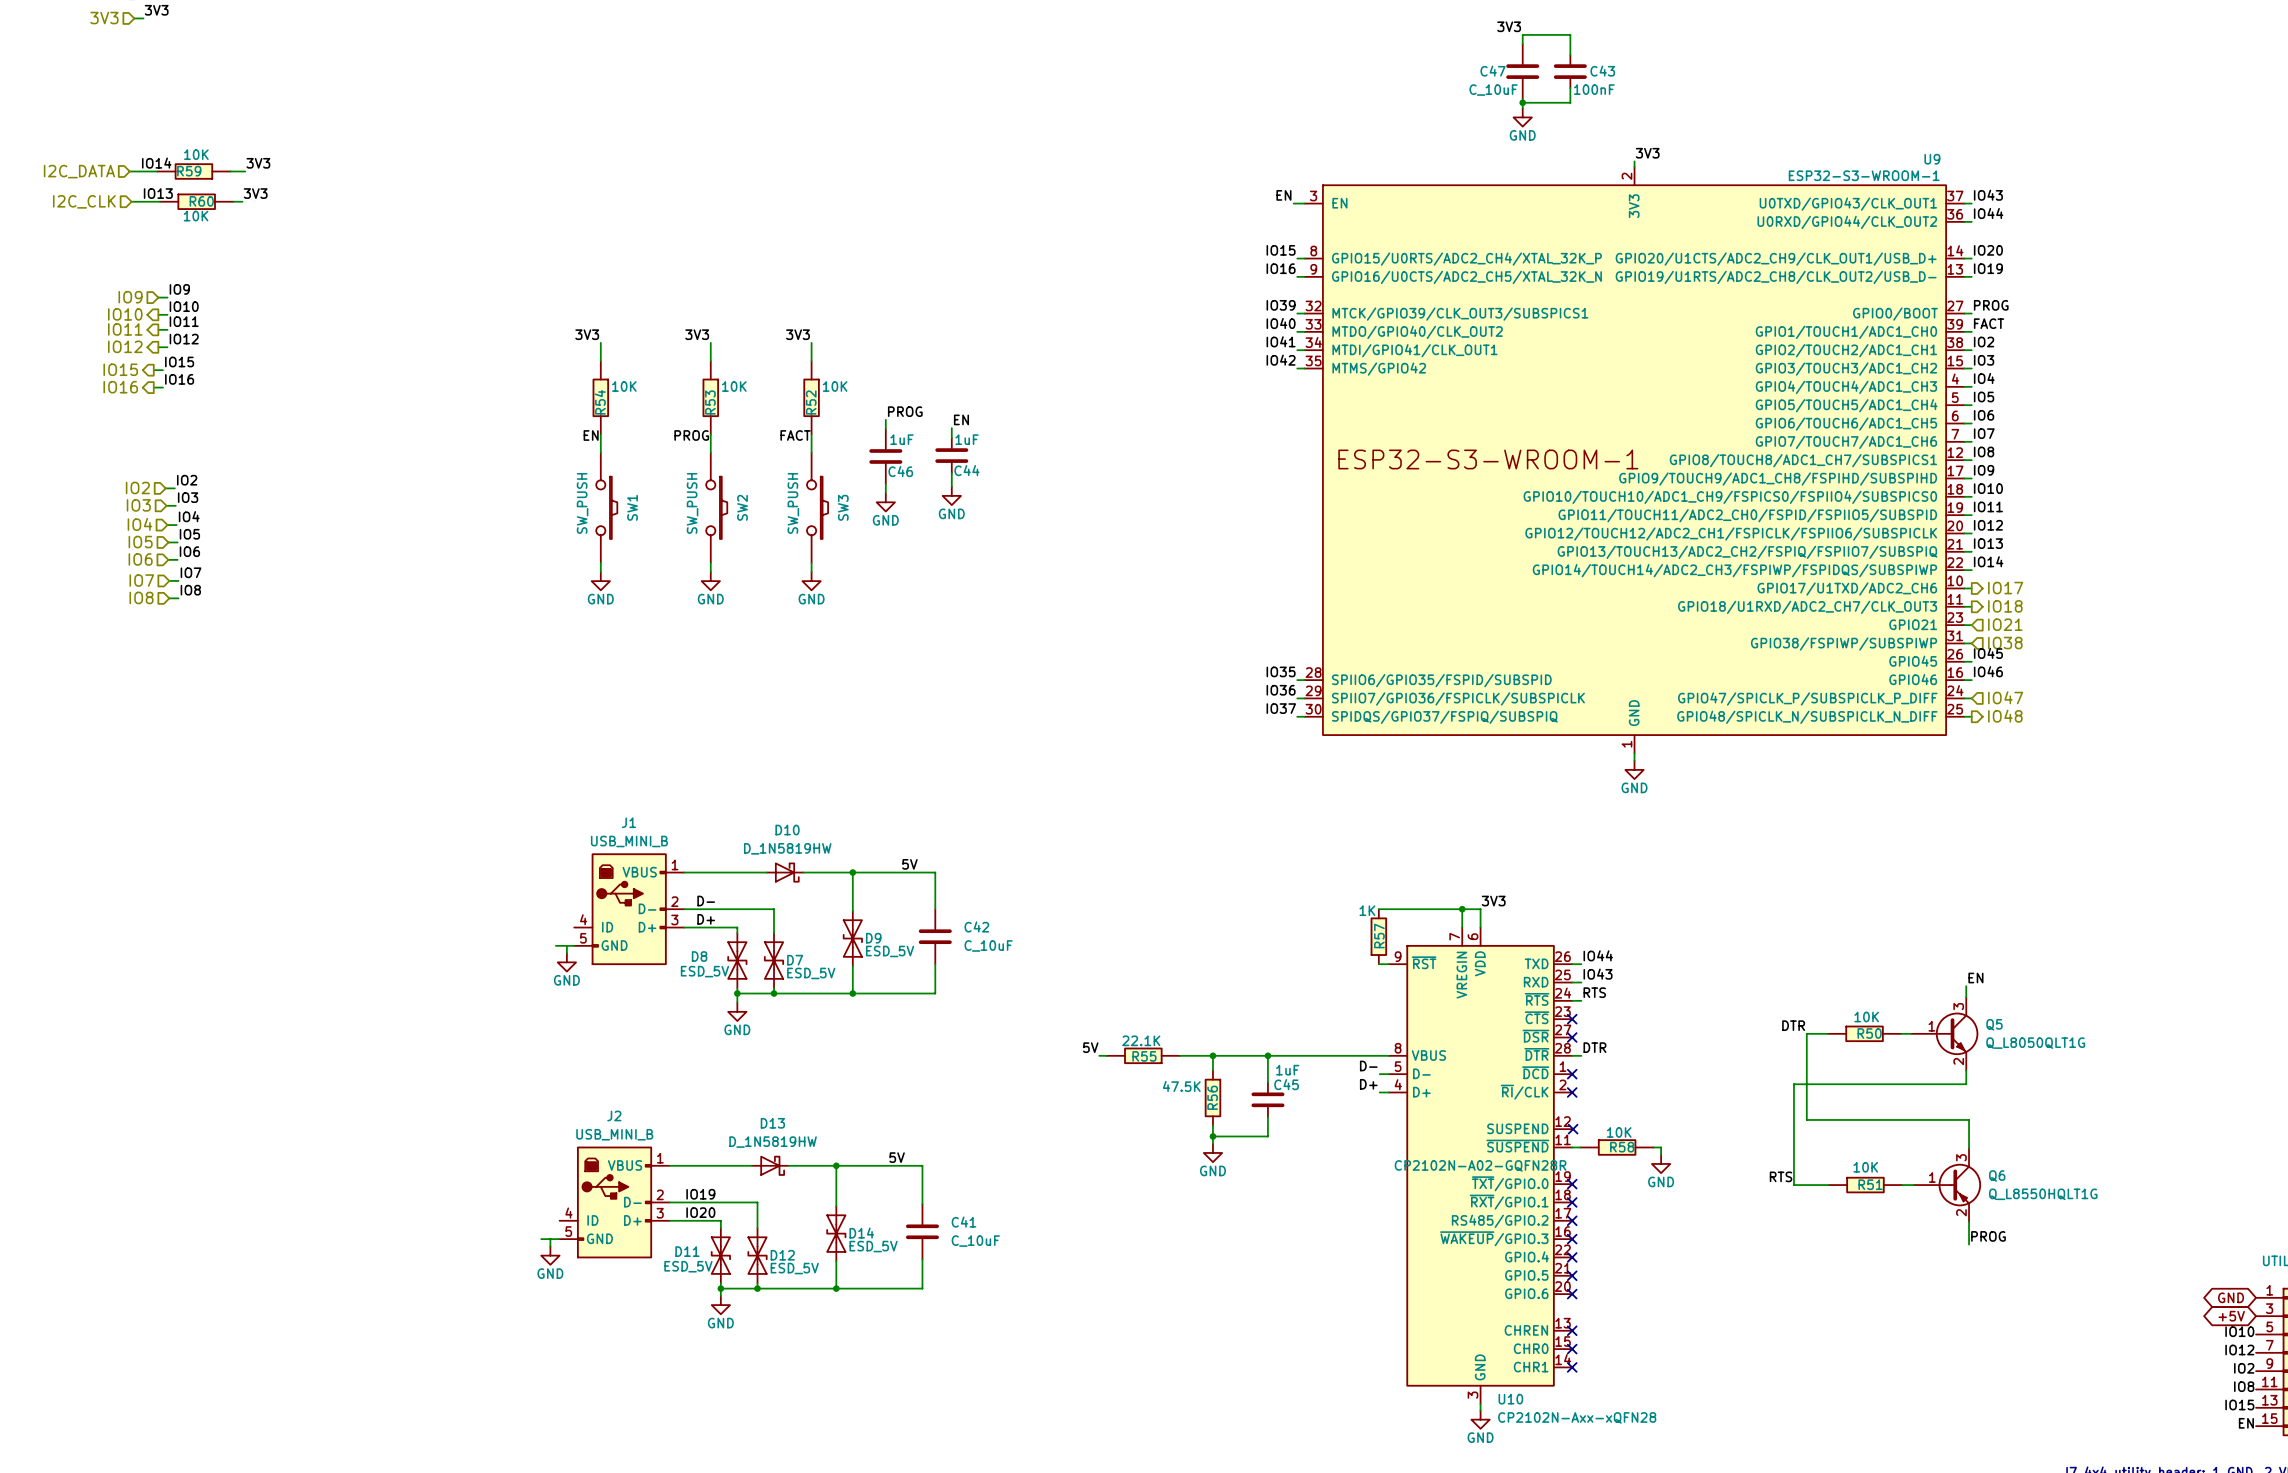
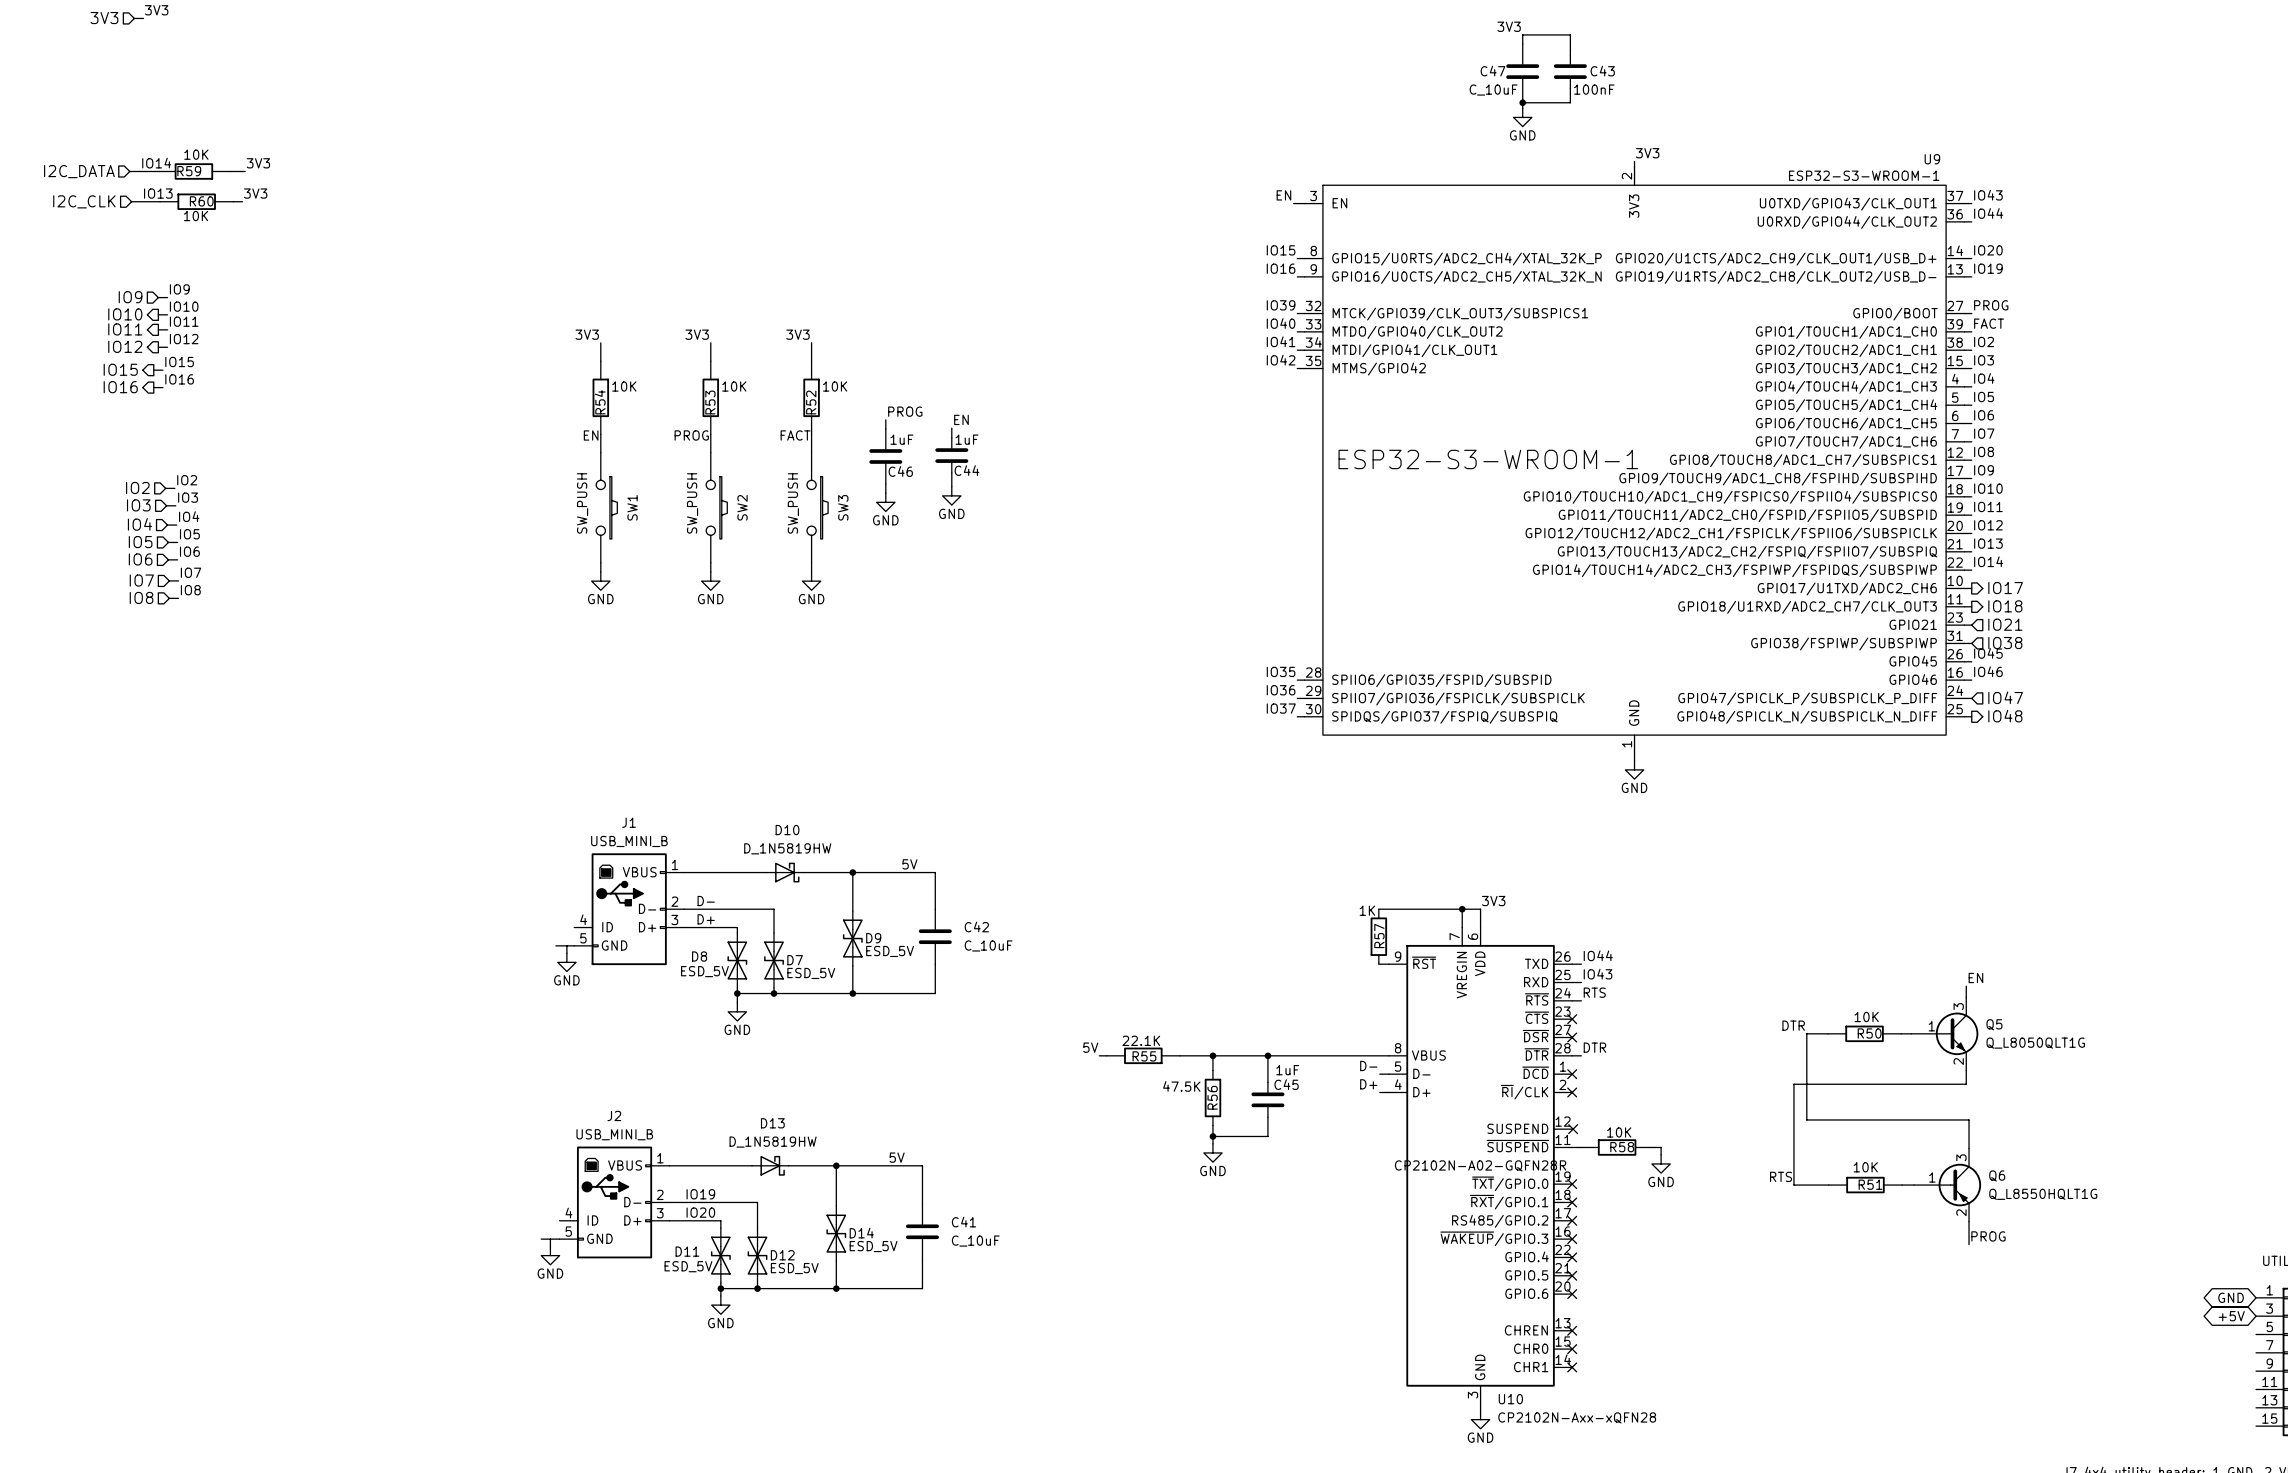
label: IO10 (2239, 1331) -> none
label: IO12 (2239, 1350) -> none
label: IO2 (2244, 1368) -> none
label: IO8 (2244, 1386) -> none
label: IO15 (2239, 1404) -> none
label: EN (2246, 1423) -> none

